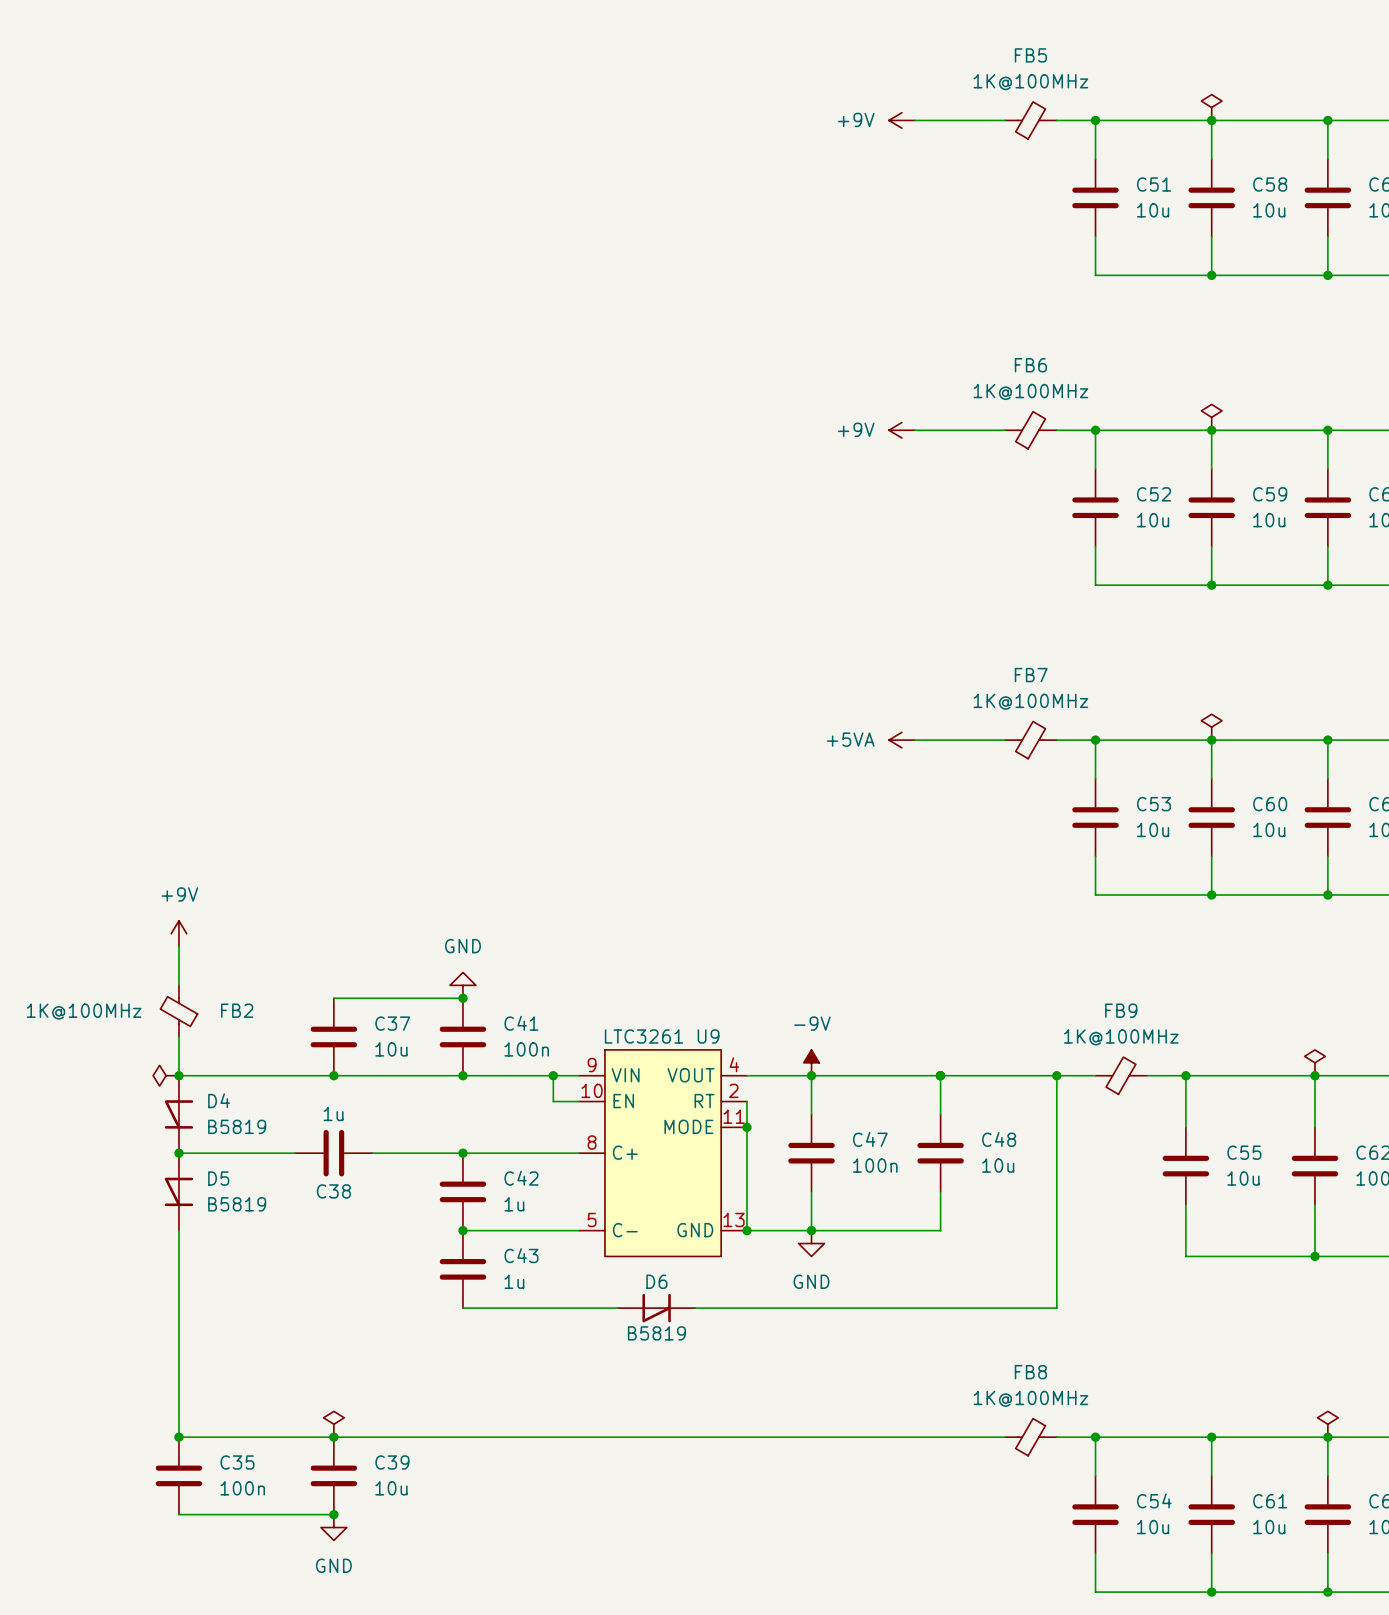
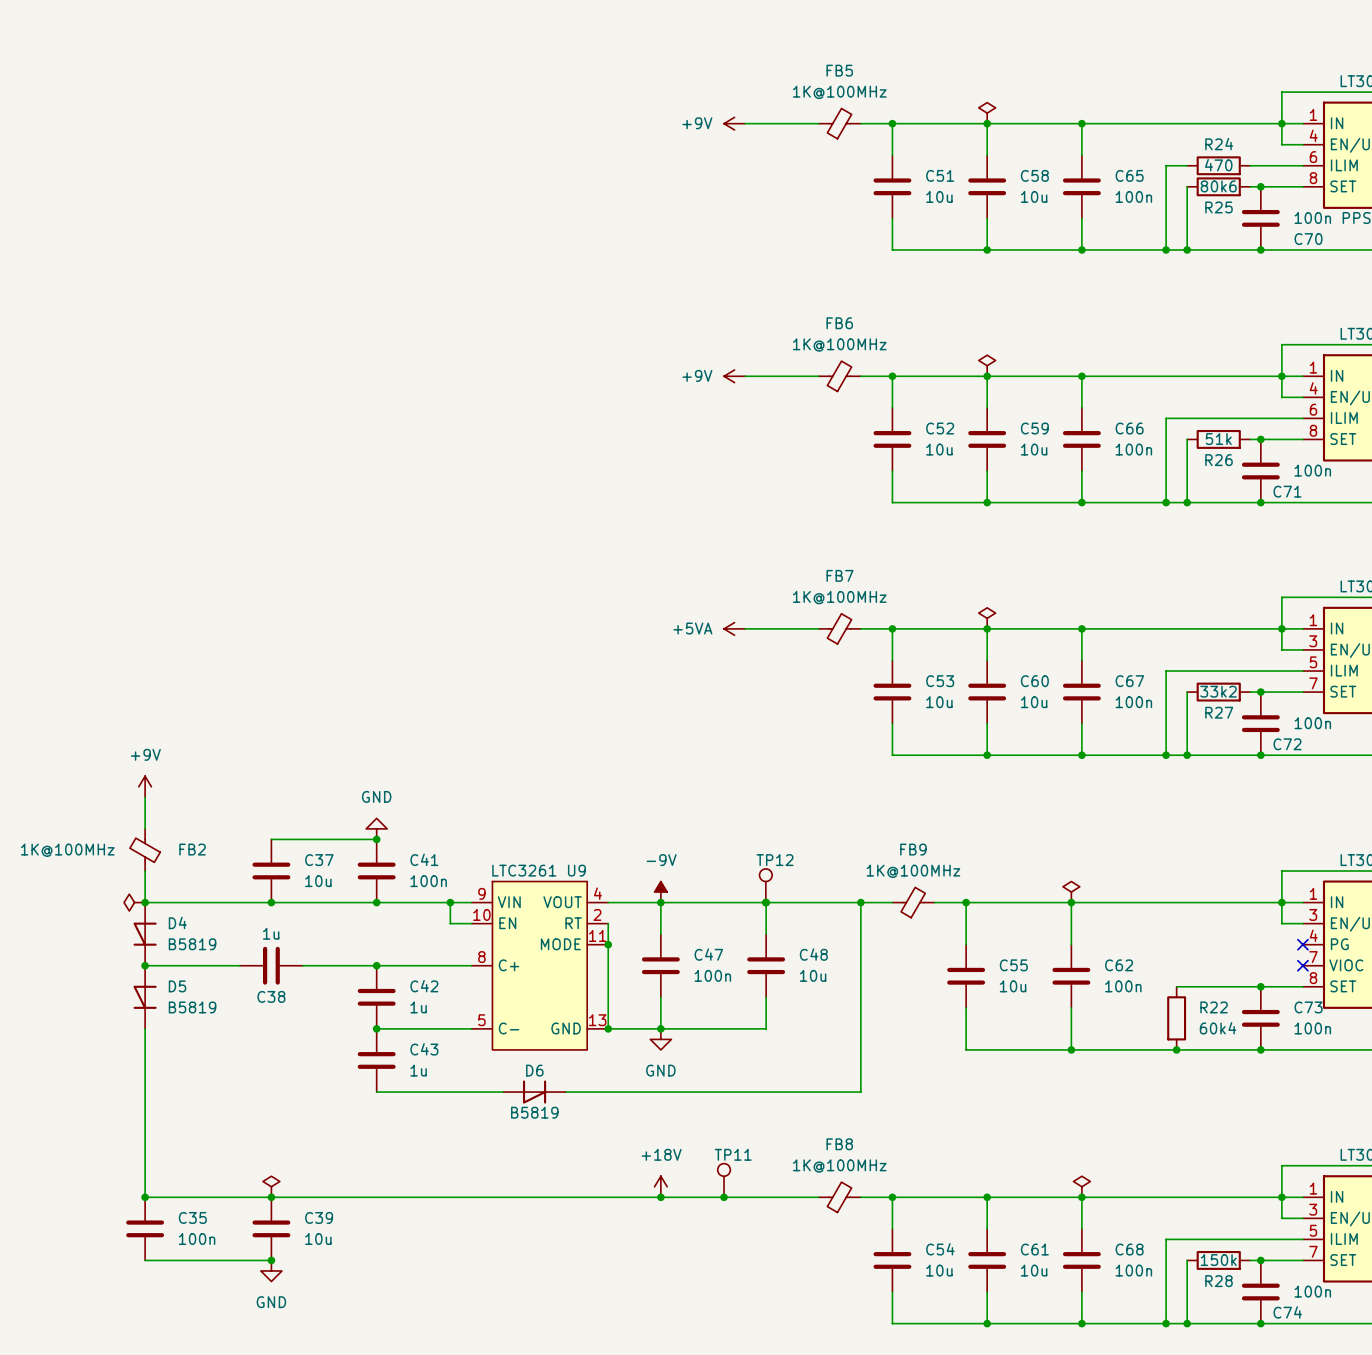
TP12: none -> (765, 885)
TP11: none -> (724, 1180)
power symbol: none -> +18V (660, 1186)
junction: none -> (660, 1197)
junction: none -> (724, 1197)

